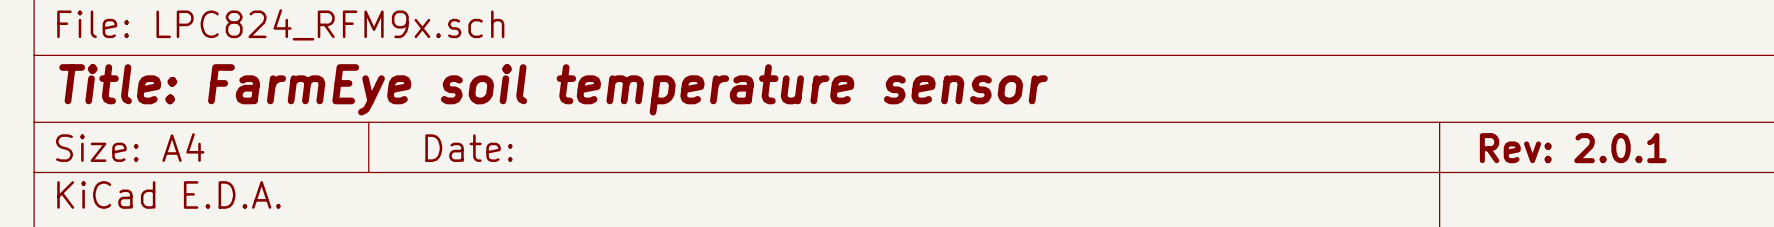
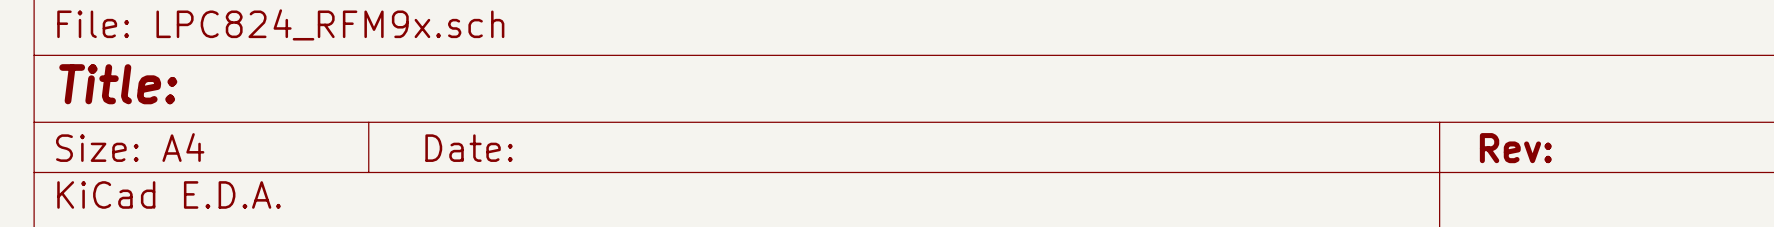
title block: Title: FarmEye soil temperature sensor (553, 89) -> Title: (118, 84)
title block: Rev: 2.0.1 (1573, 148) -> Rev: (1515, 148)

